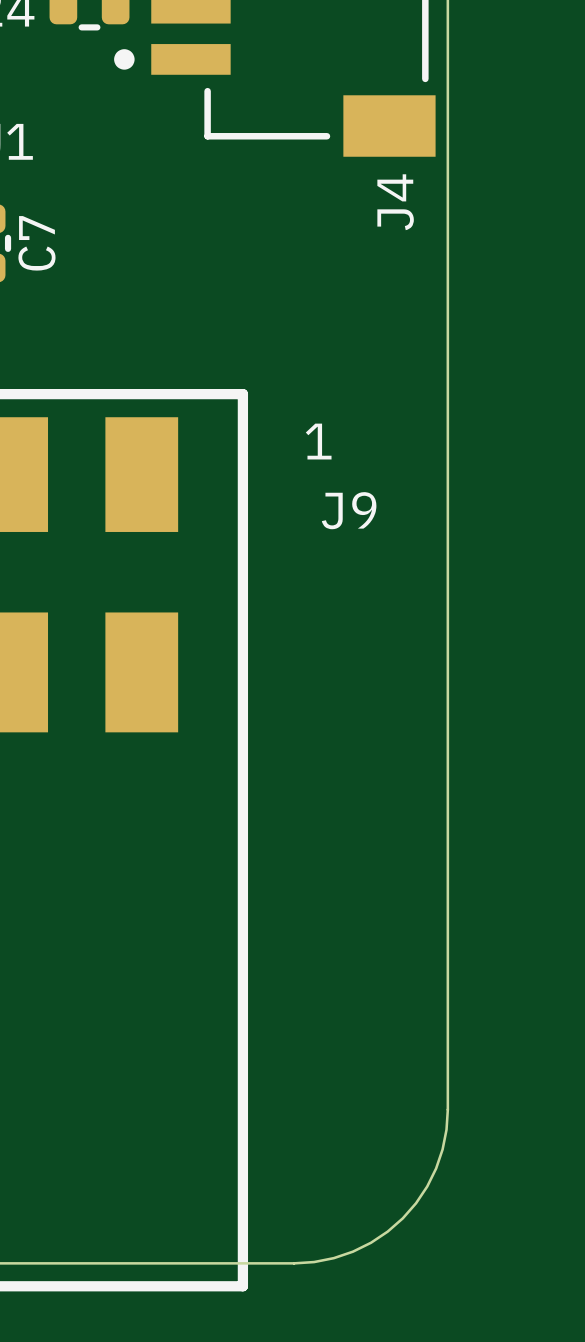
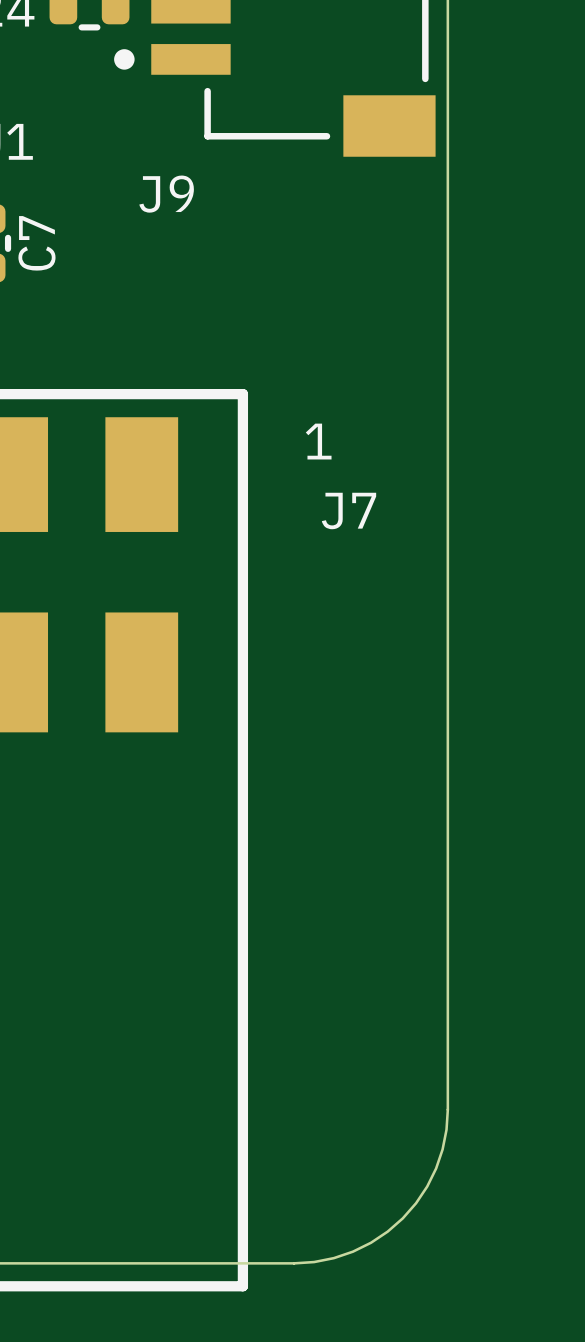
J4 name: J4 (395, 202) -> J9 (166, 194)
J9 name: J9 (349, 510) -> J7 (349, 510)

